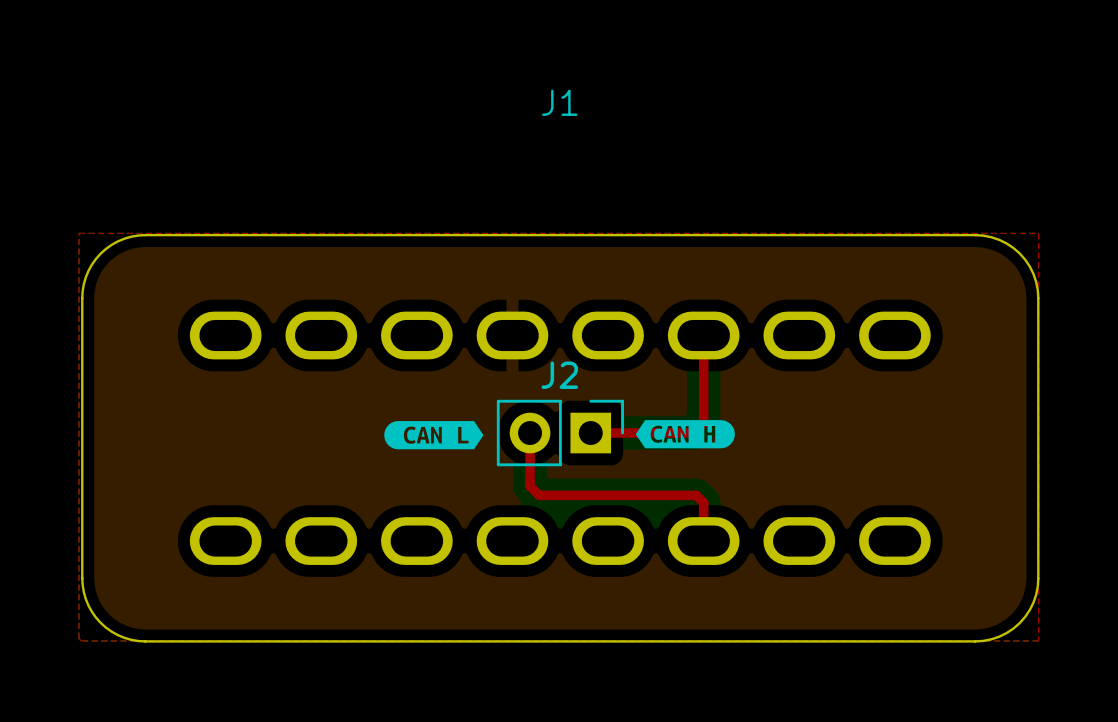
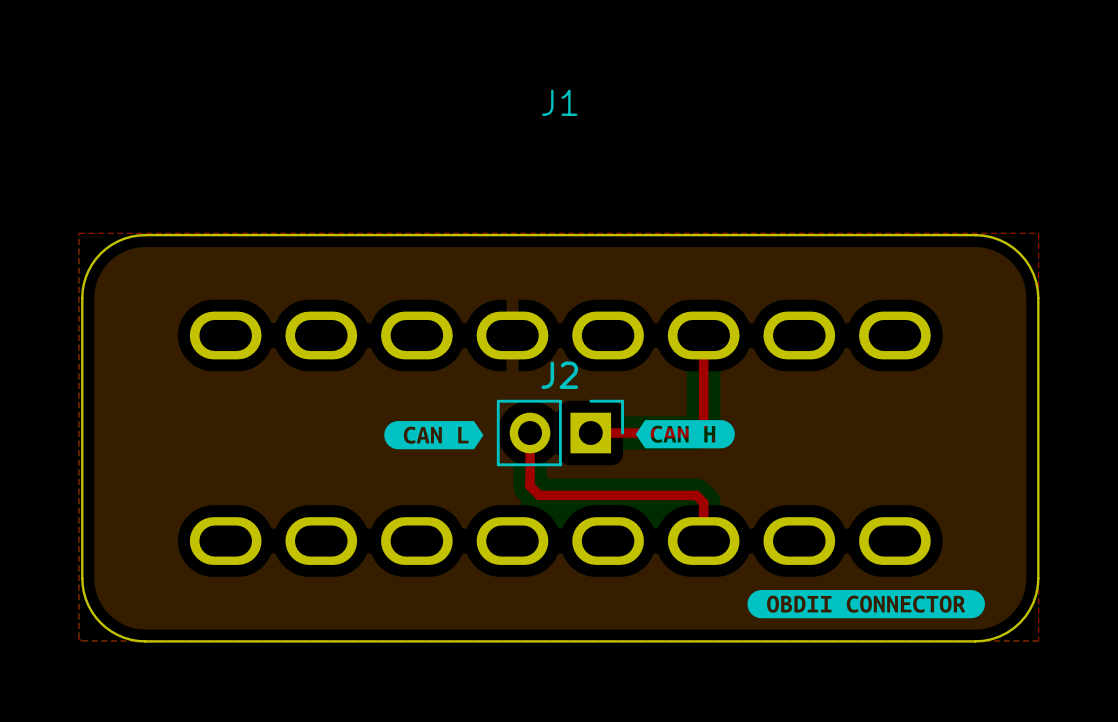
drawing: none -> [747, 590, 985, 619]

